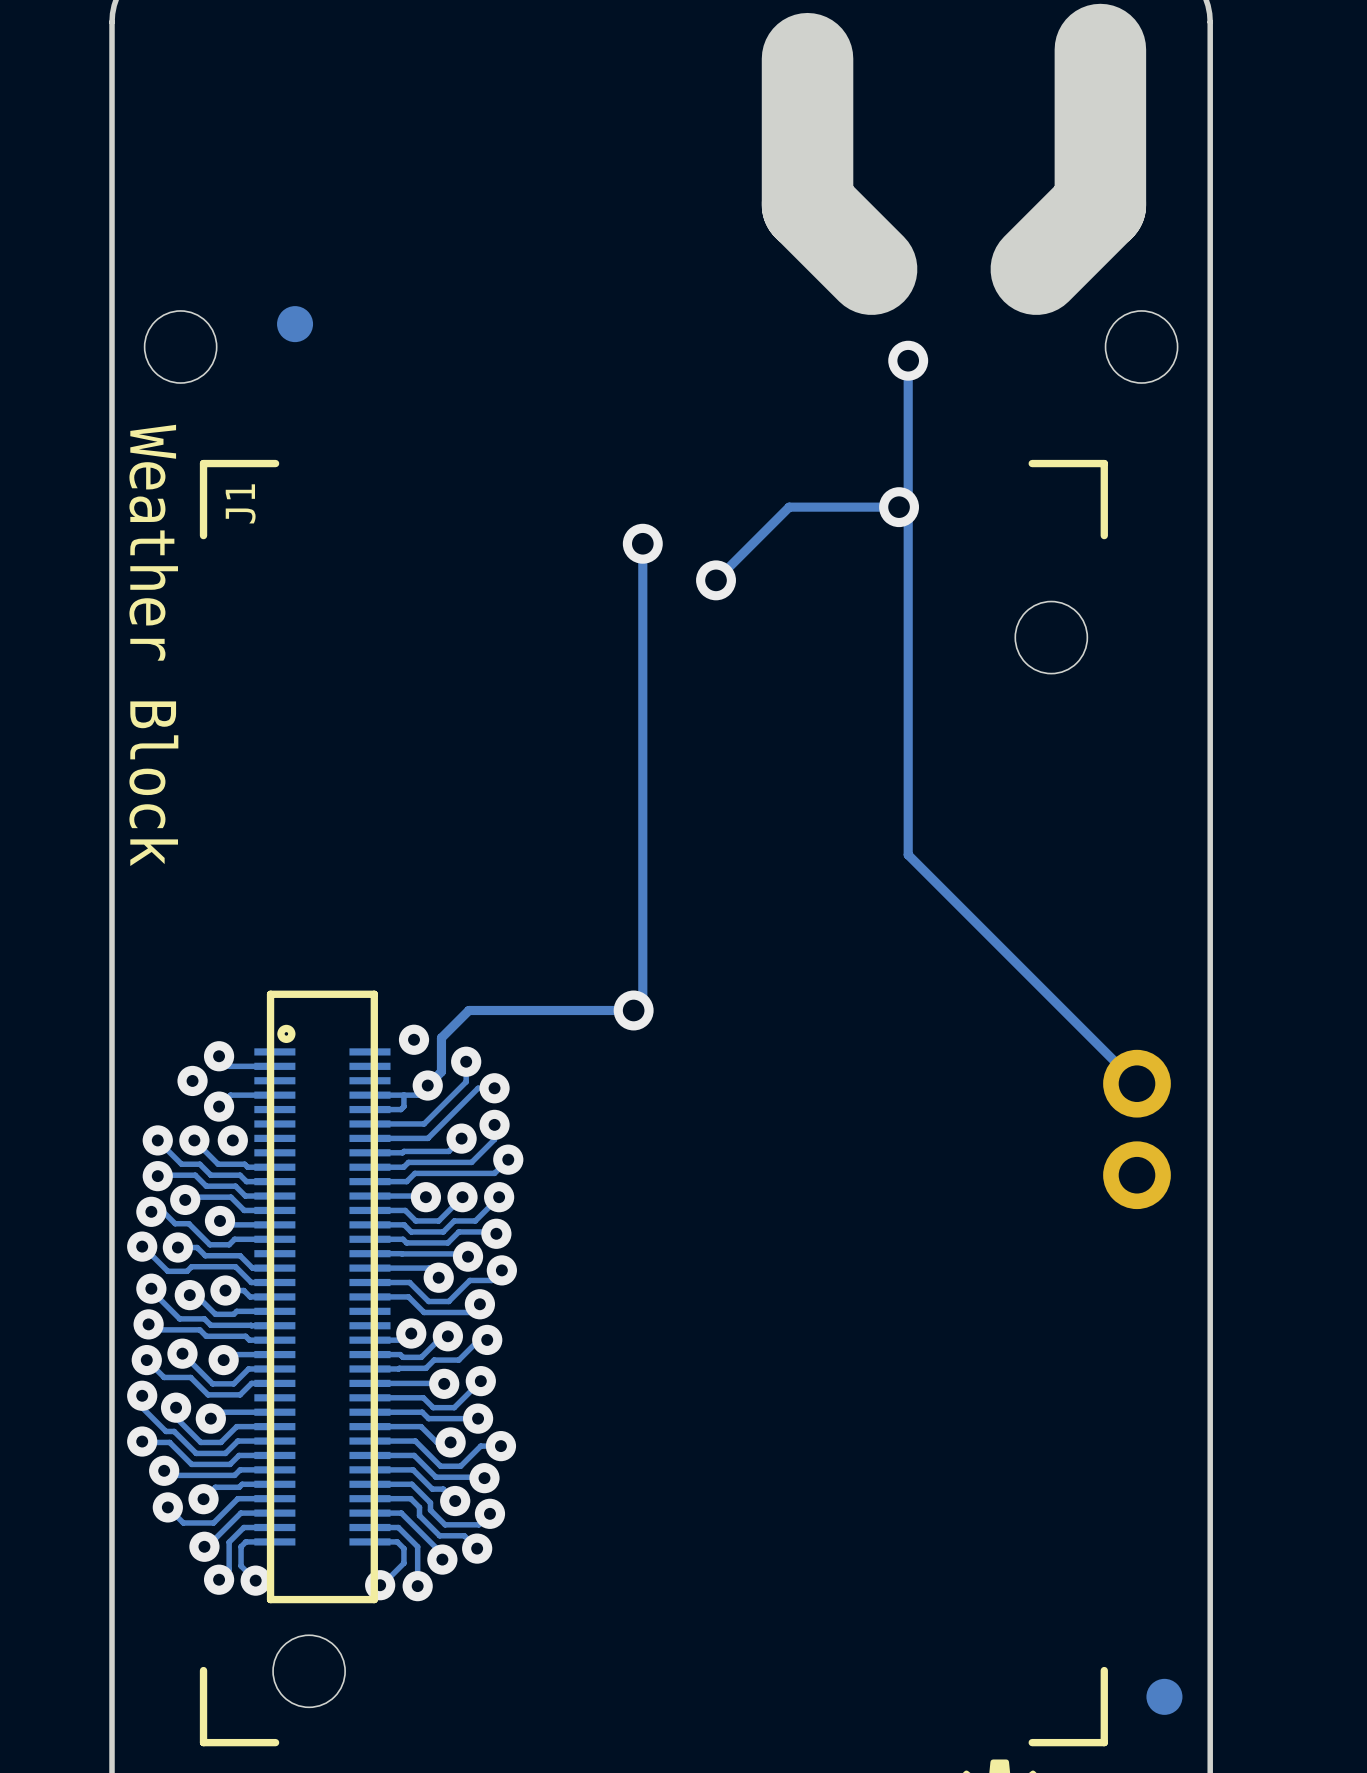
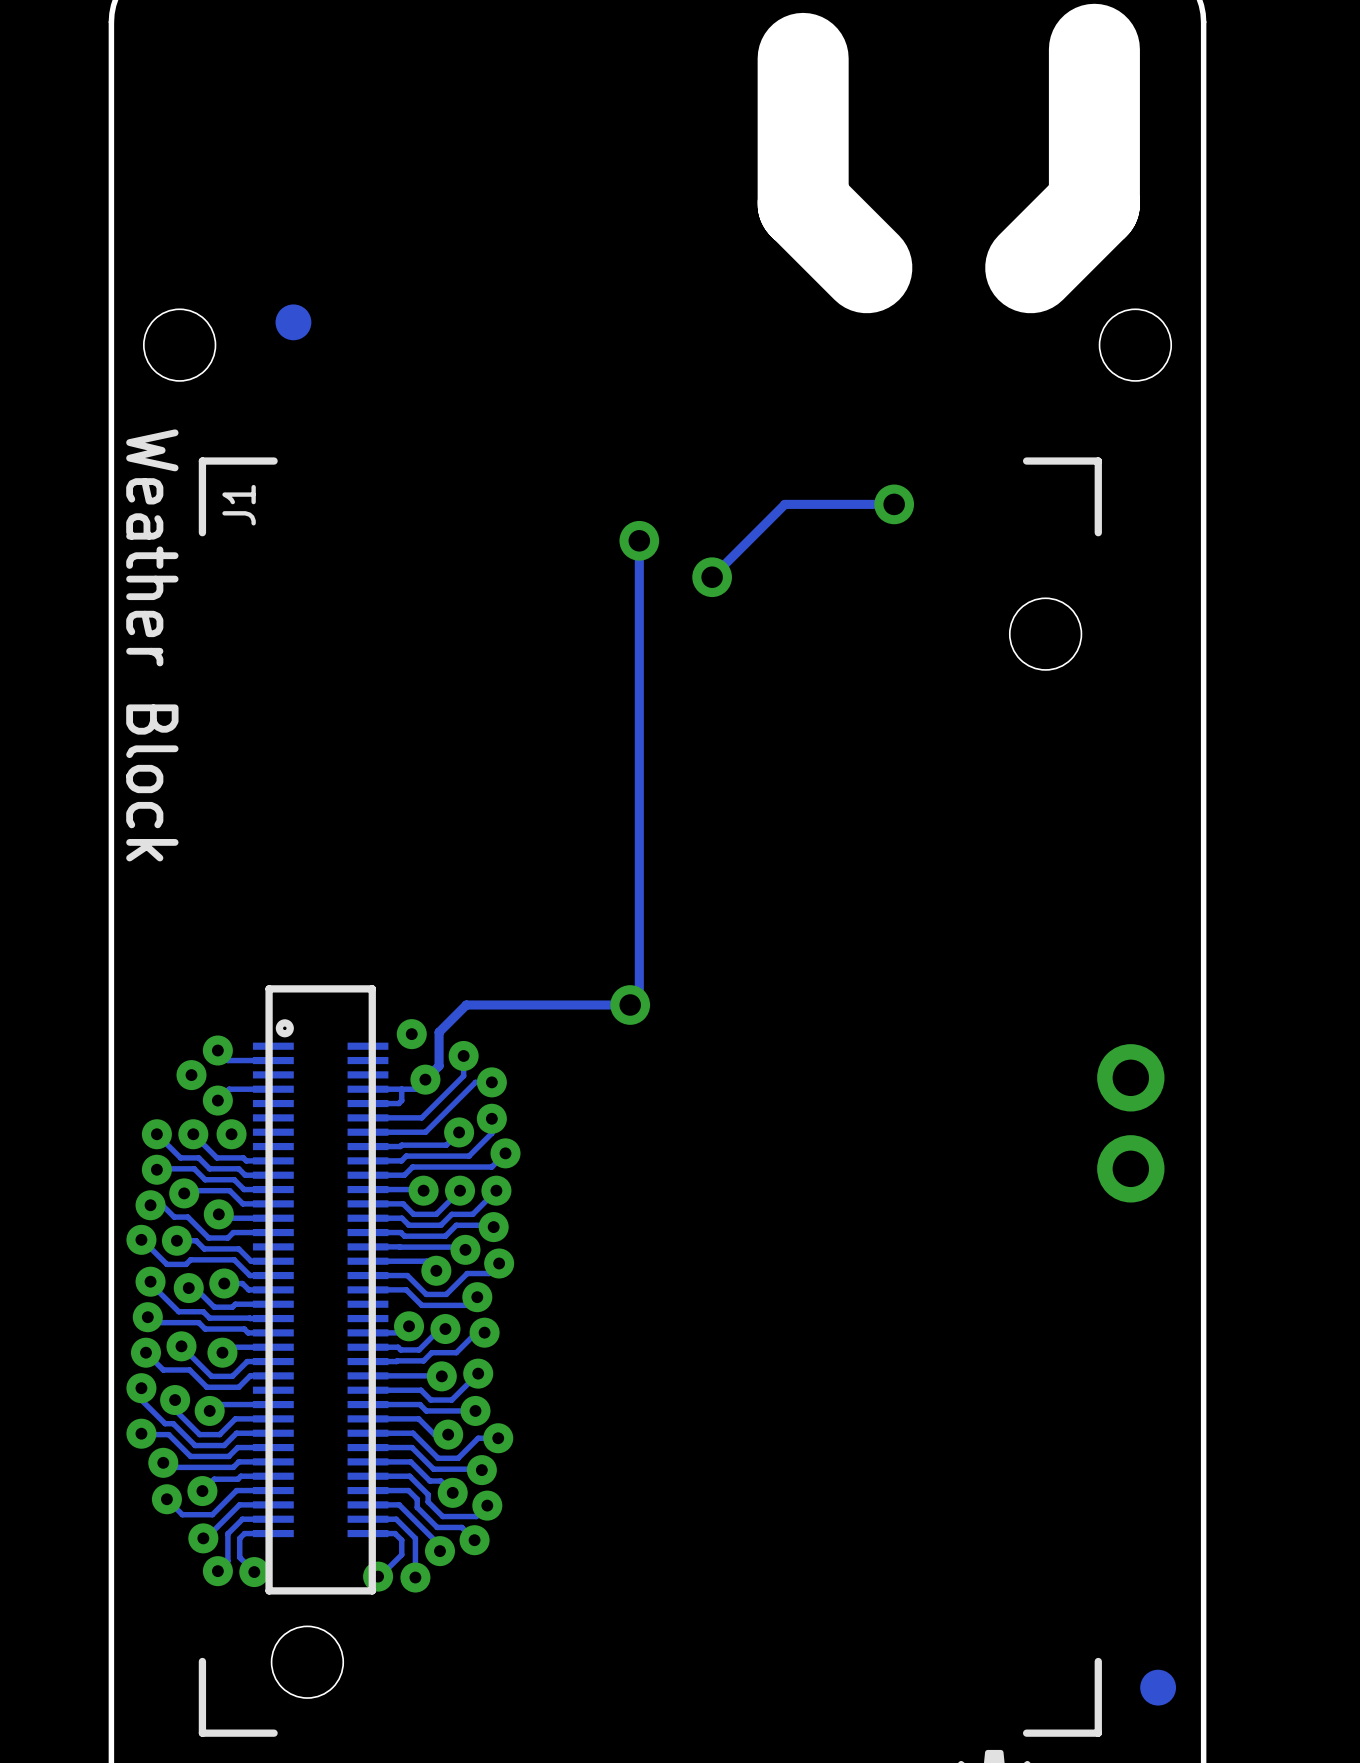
track: (908, 360) (908, 854) (1136, 1083) -> none
via: (908, 360) -> none

